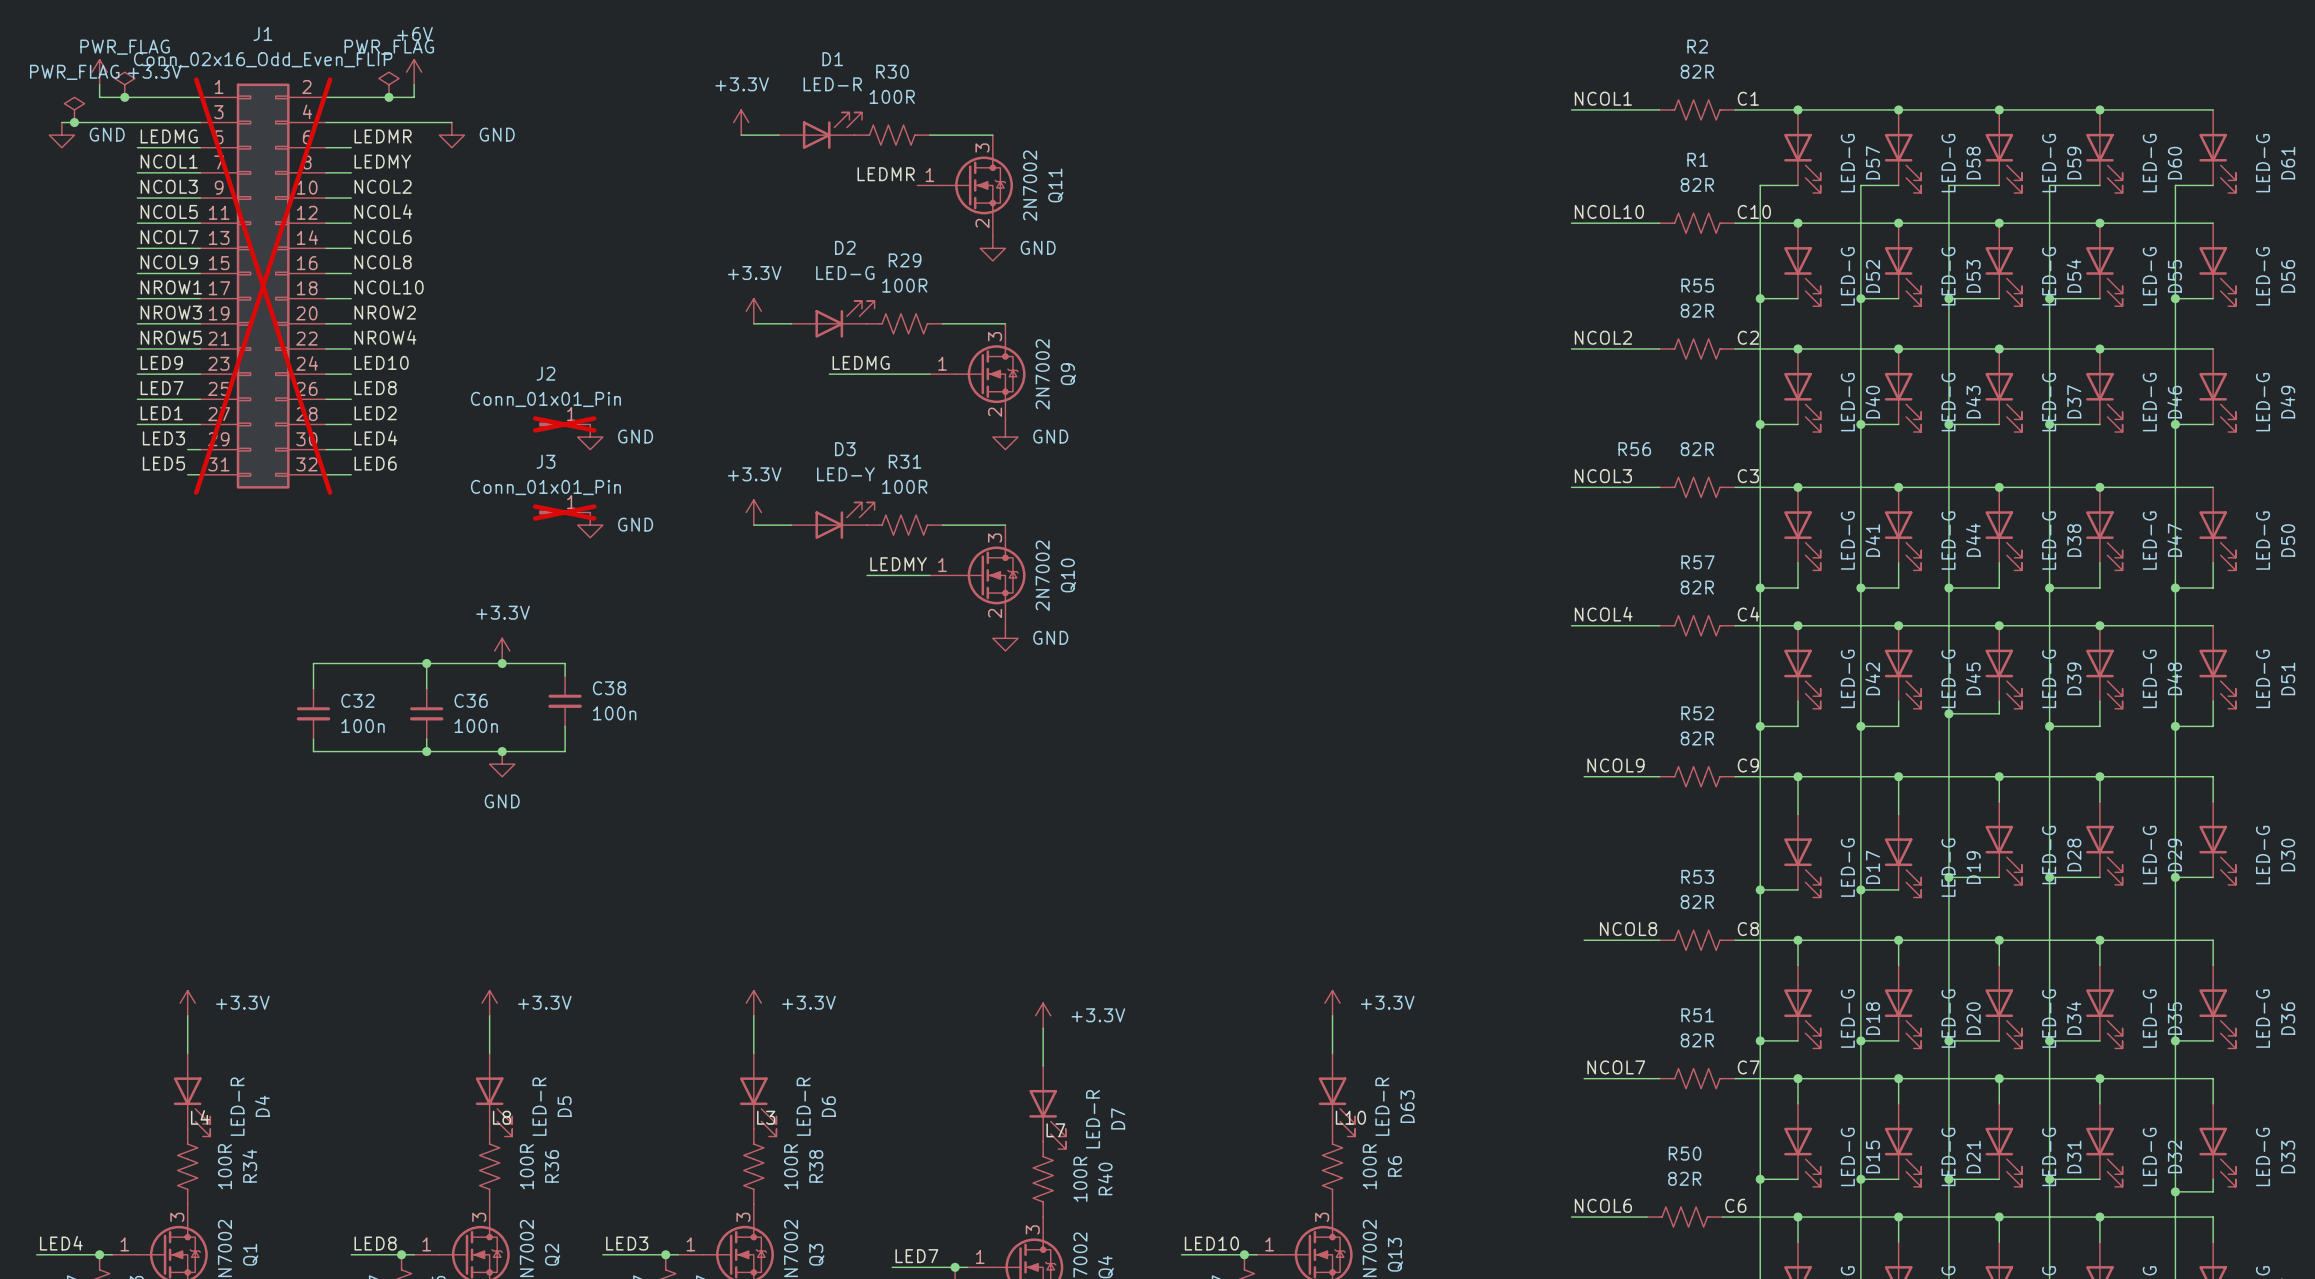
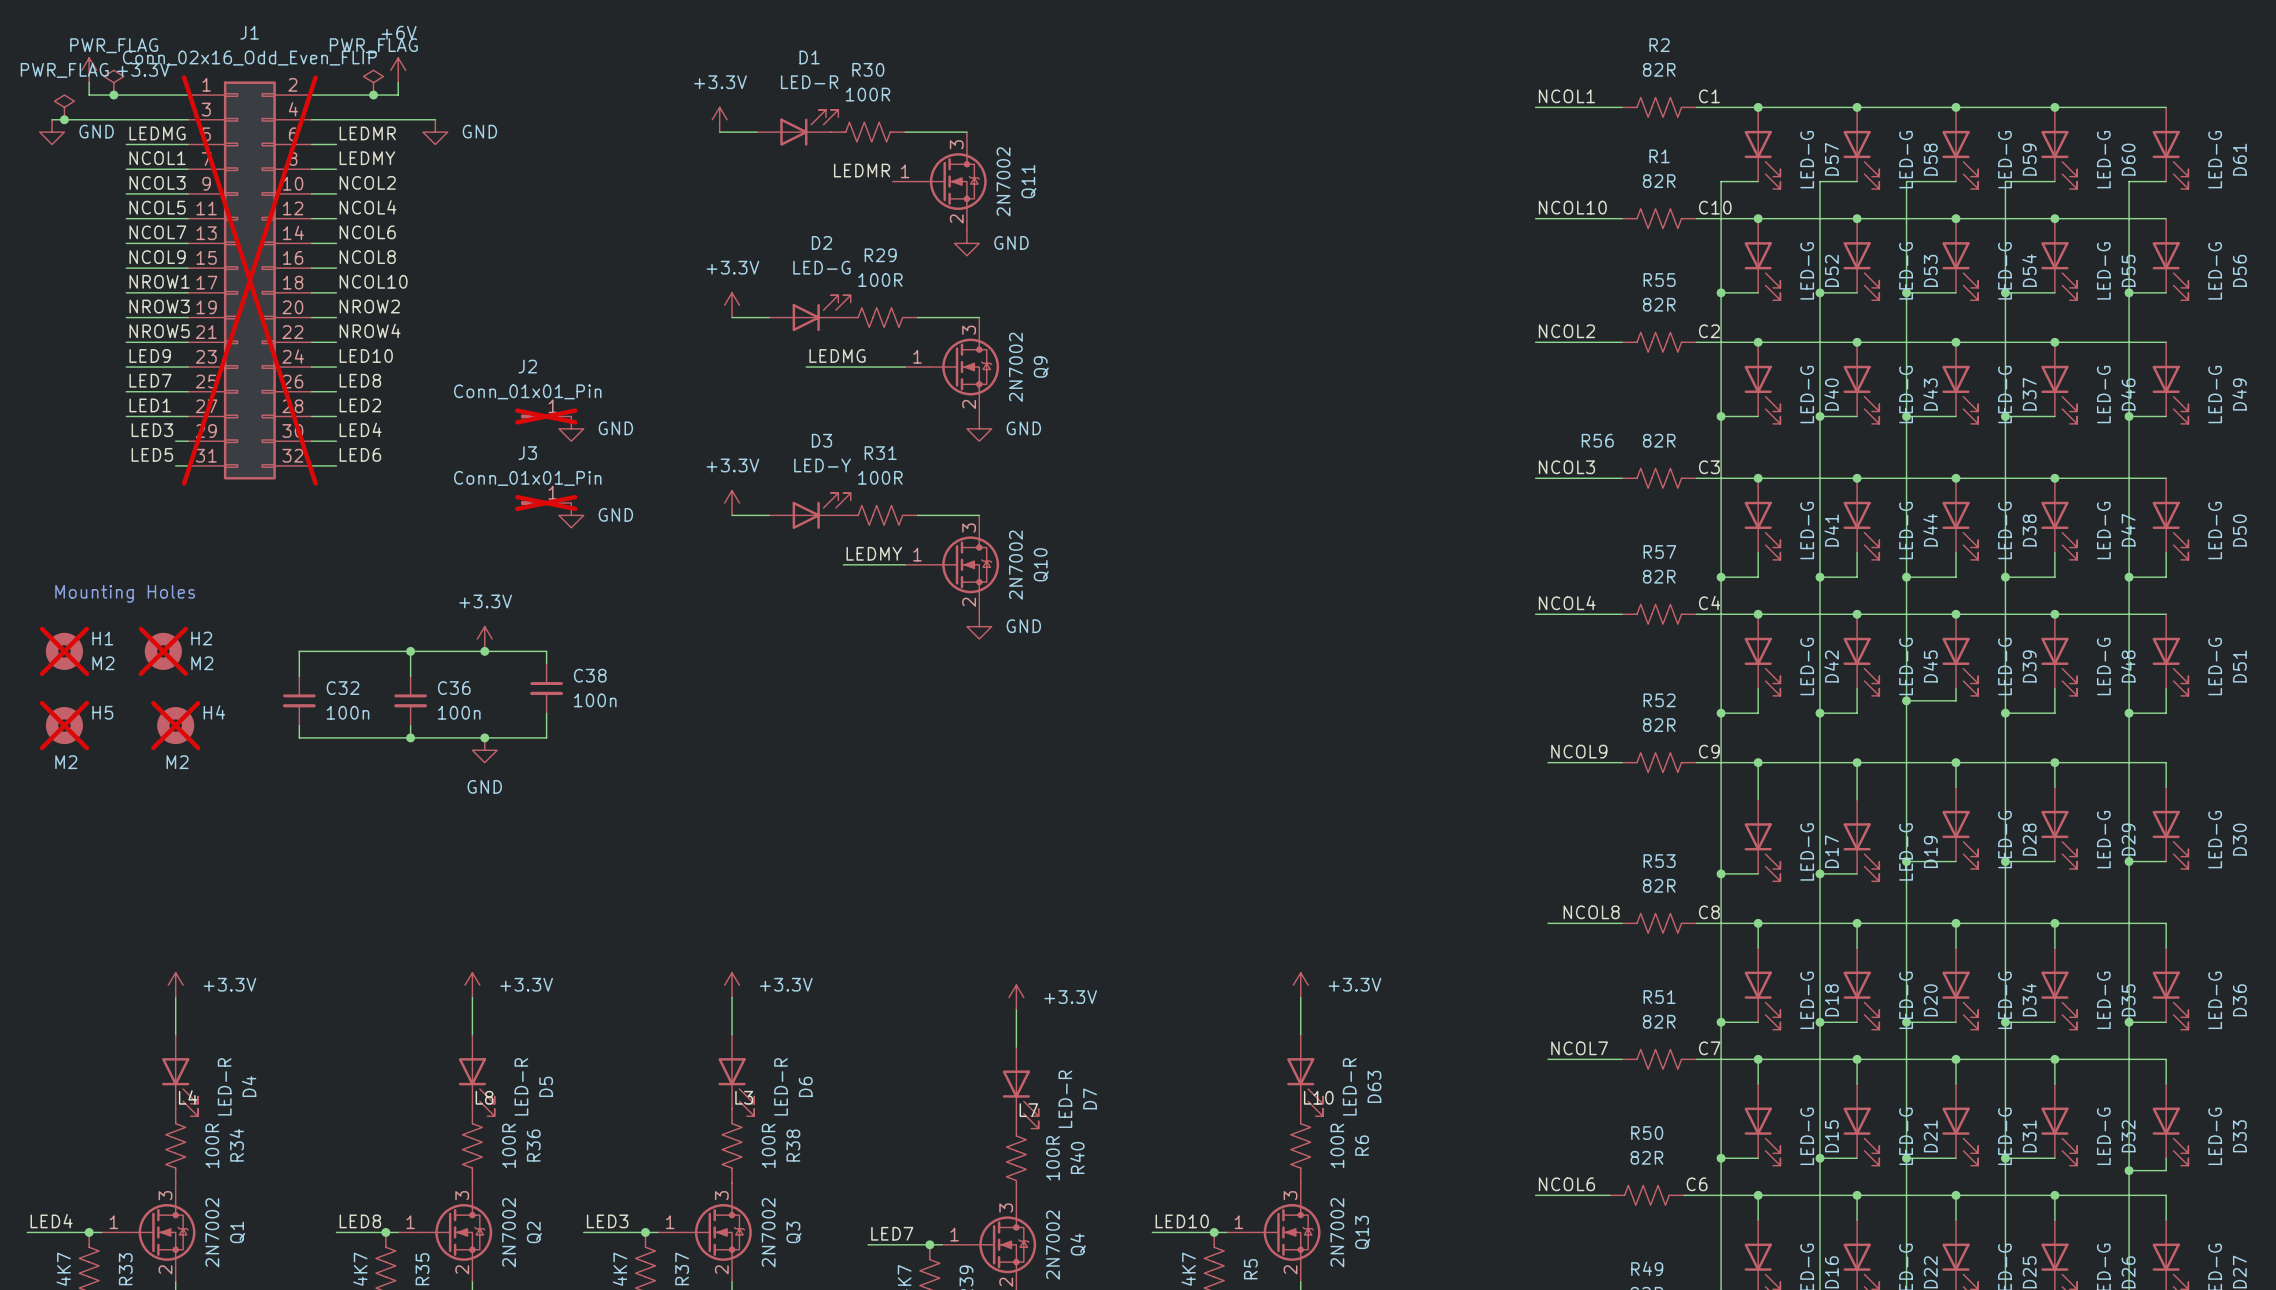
text: none -> Mounting Holes (125, 593)
H1: none -> M2 (64, 651)
H2: none -> M2 (163, 651)
H5: none -> M2 (64, 725)
H4: none -> M2 (175, 725)

